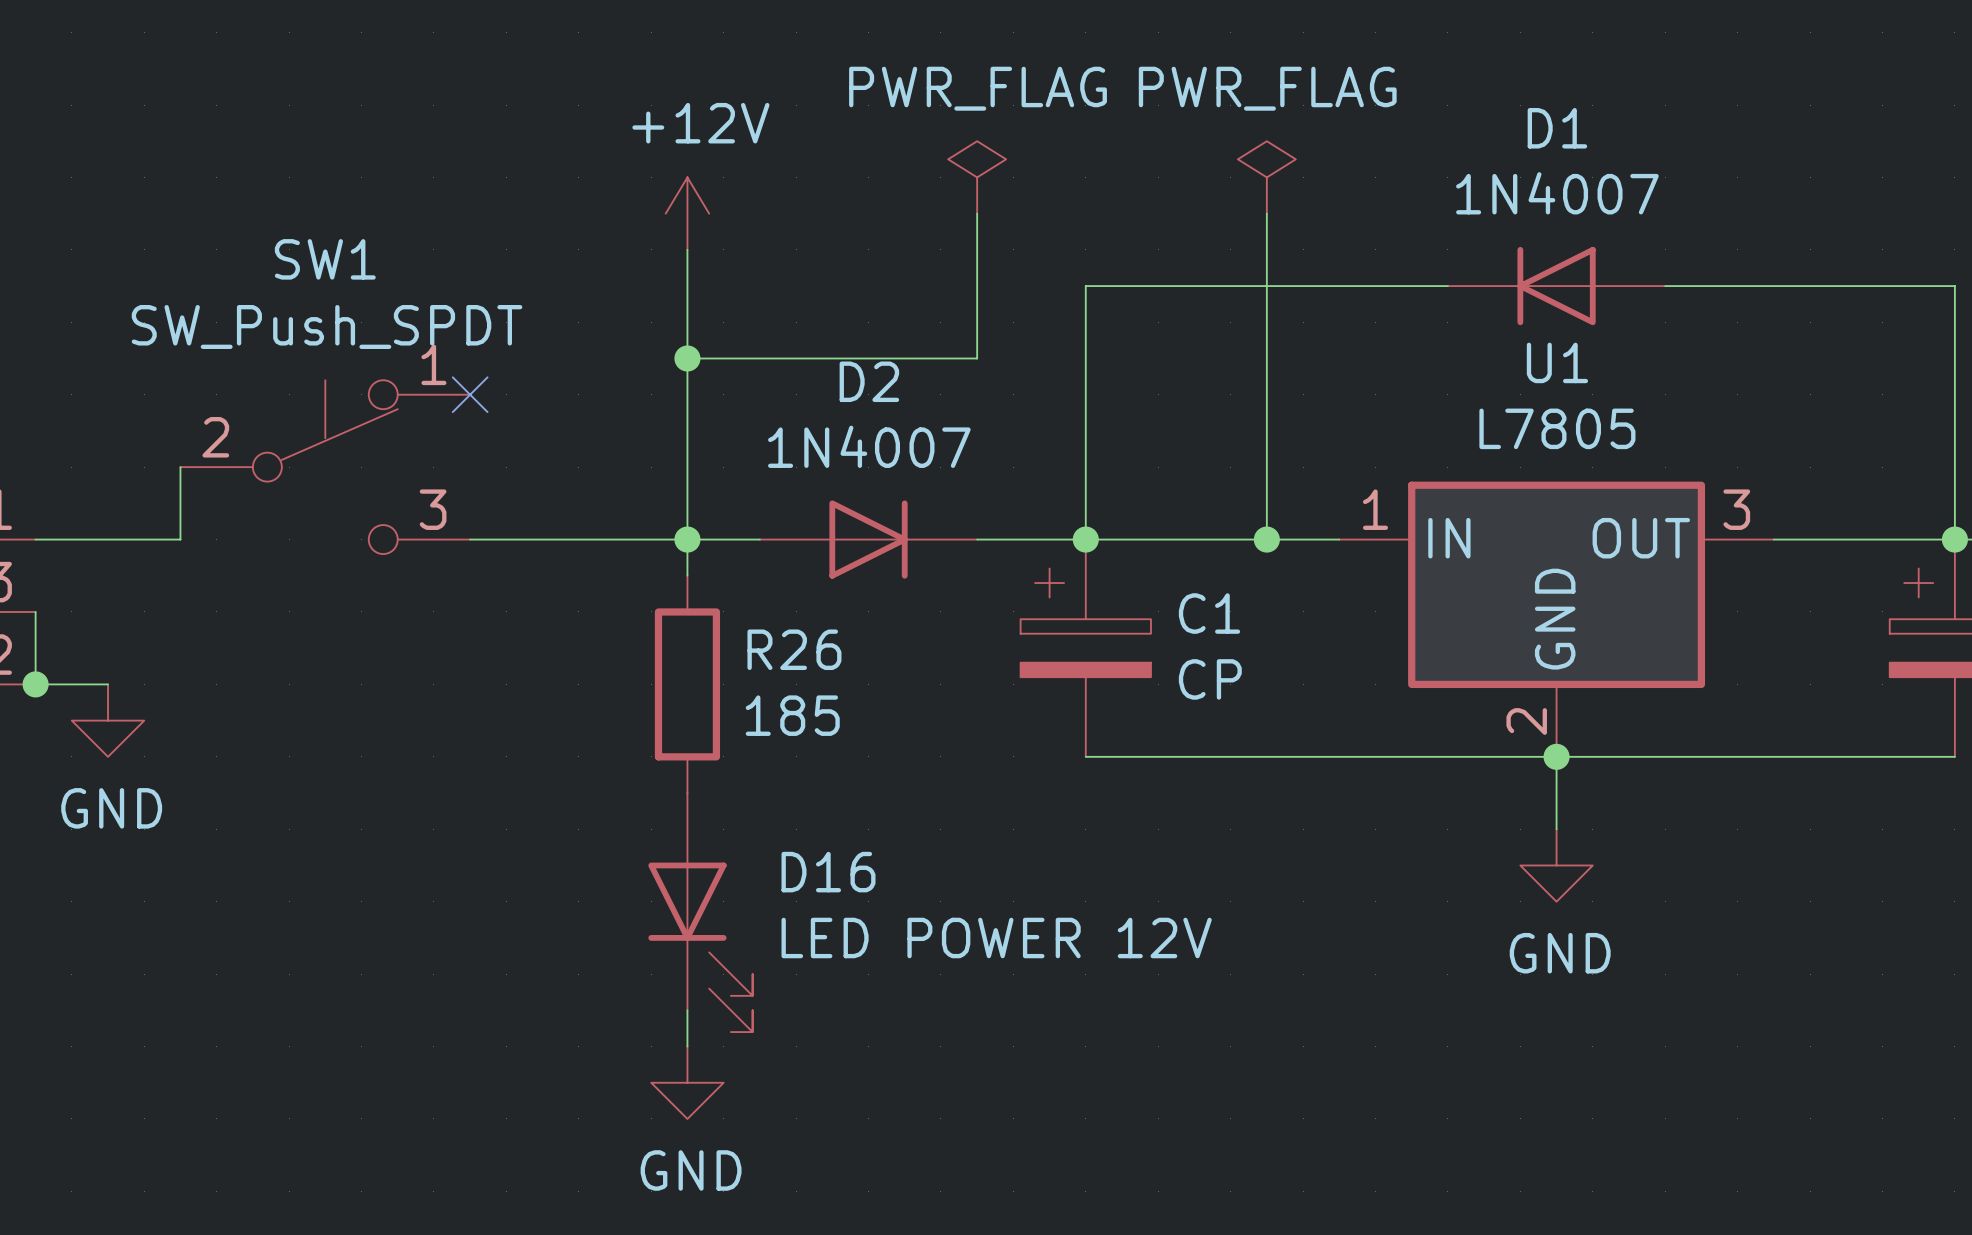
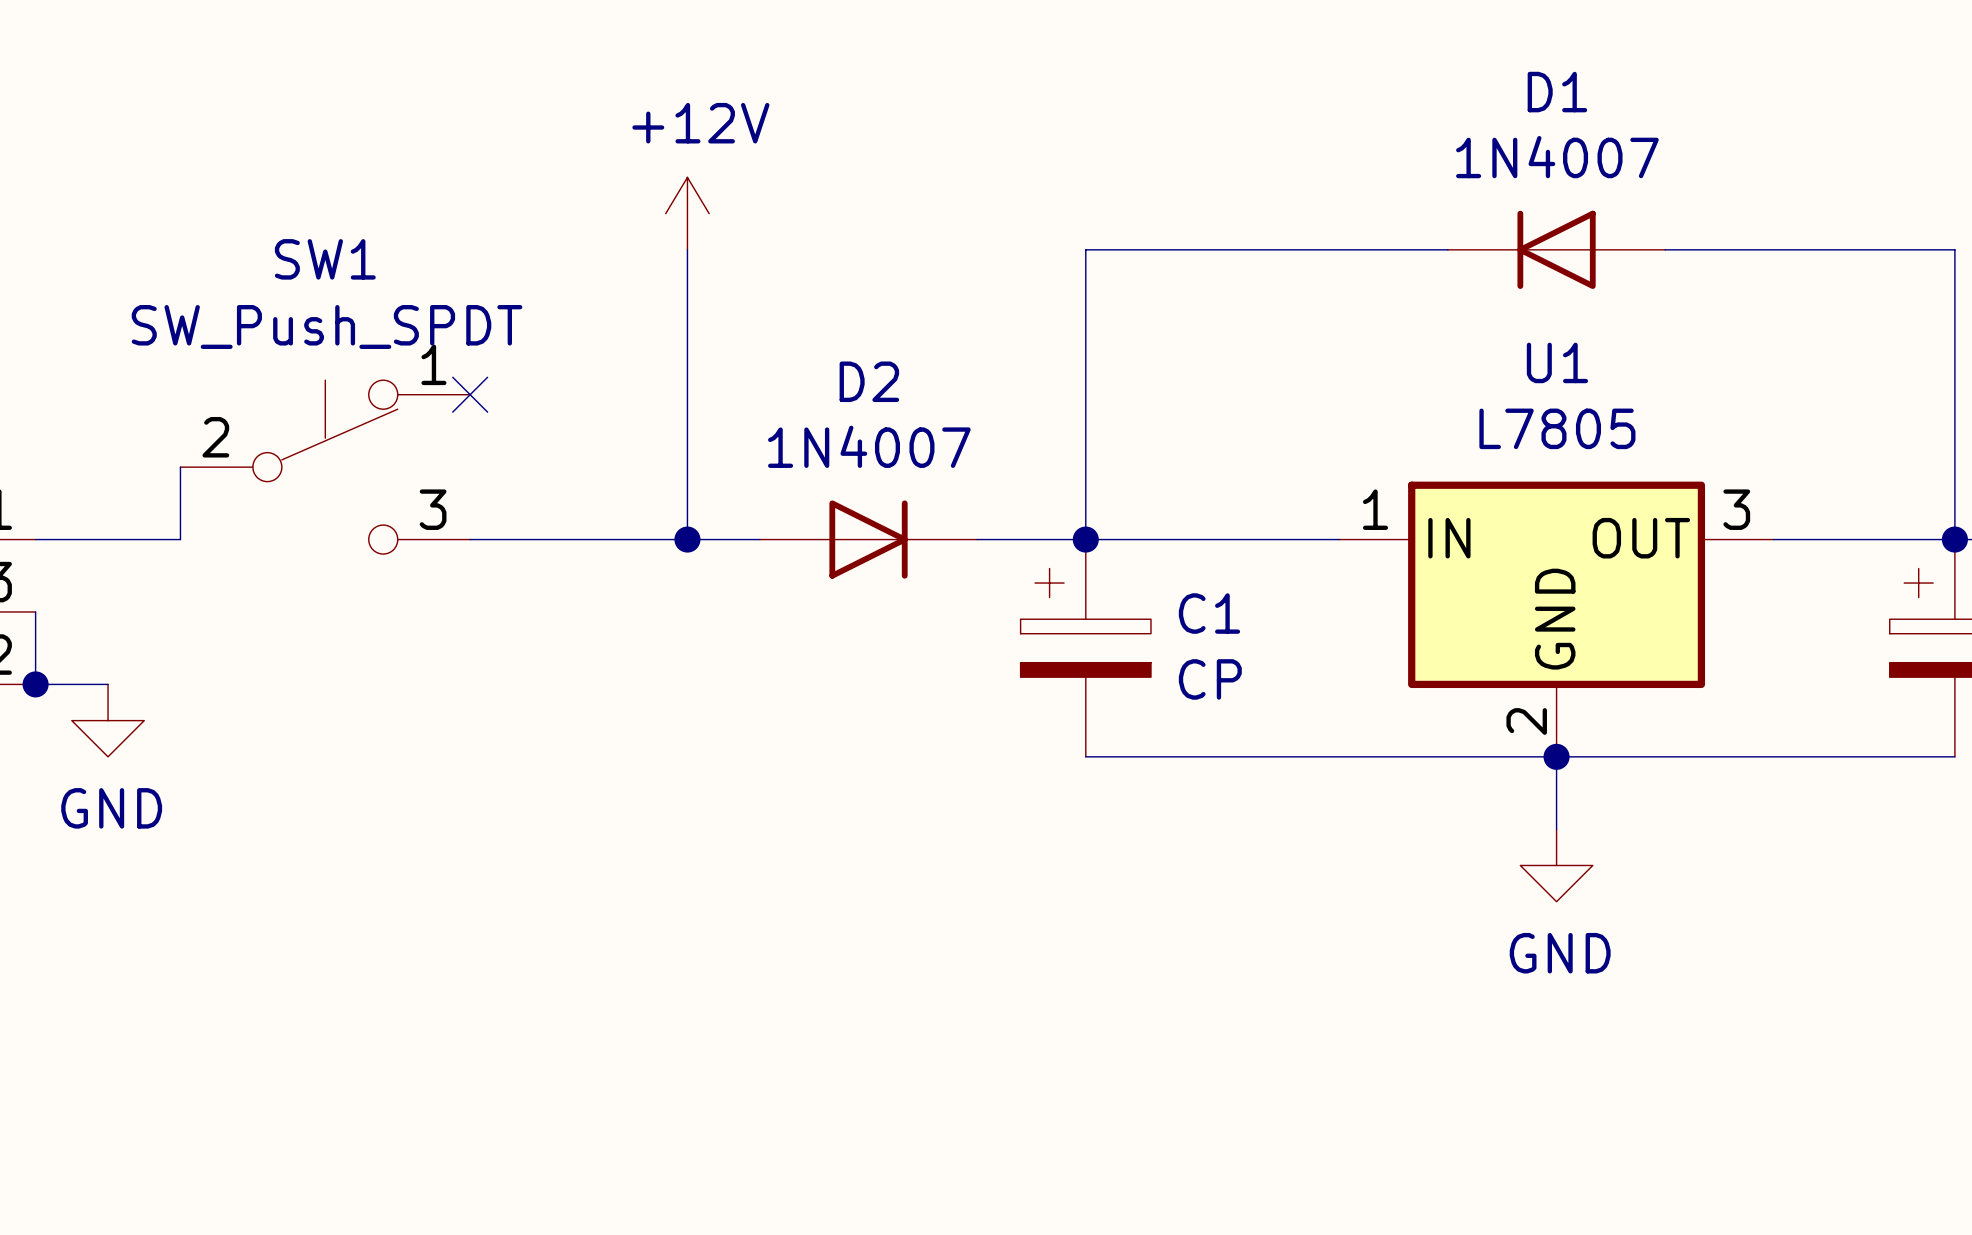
power symbol: PWR_FLAG (977, 177) -> none
power symbol: PWR_FLAG (1266, 177) -> none
wire: (977, 213) (977, 358) (687, 358) -> none
wire: (1266, 213) (1266, 539) -> none
wire: (1085, 286) (1447, 286) -> (1085, 286) (1085, 249) (1447, 249)
D1 position: (1556, 286) -> (1556, 249)
wire: (1665, 286) (1954, 286) -> (1665, 249) (1954, 249) (1954, 286)
junction: (687, 358) -> none
wire: (687, 539) (687, 575) -> none
junction: (1266, 539) -> none
R26: 185 (687, 684) -> none
D16: LED POWER 12V (700, 912) -> none
wire: (687, 1010) (687, 1046) -> none
power symbol: GND (687, 1082) -> none

